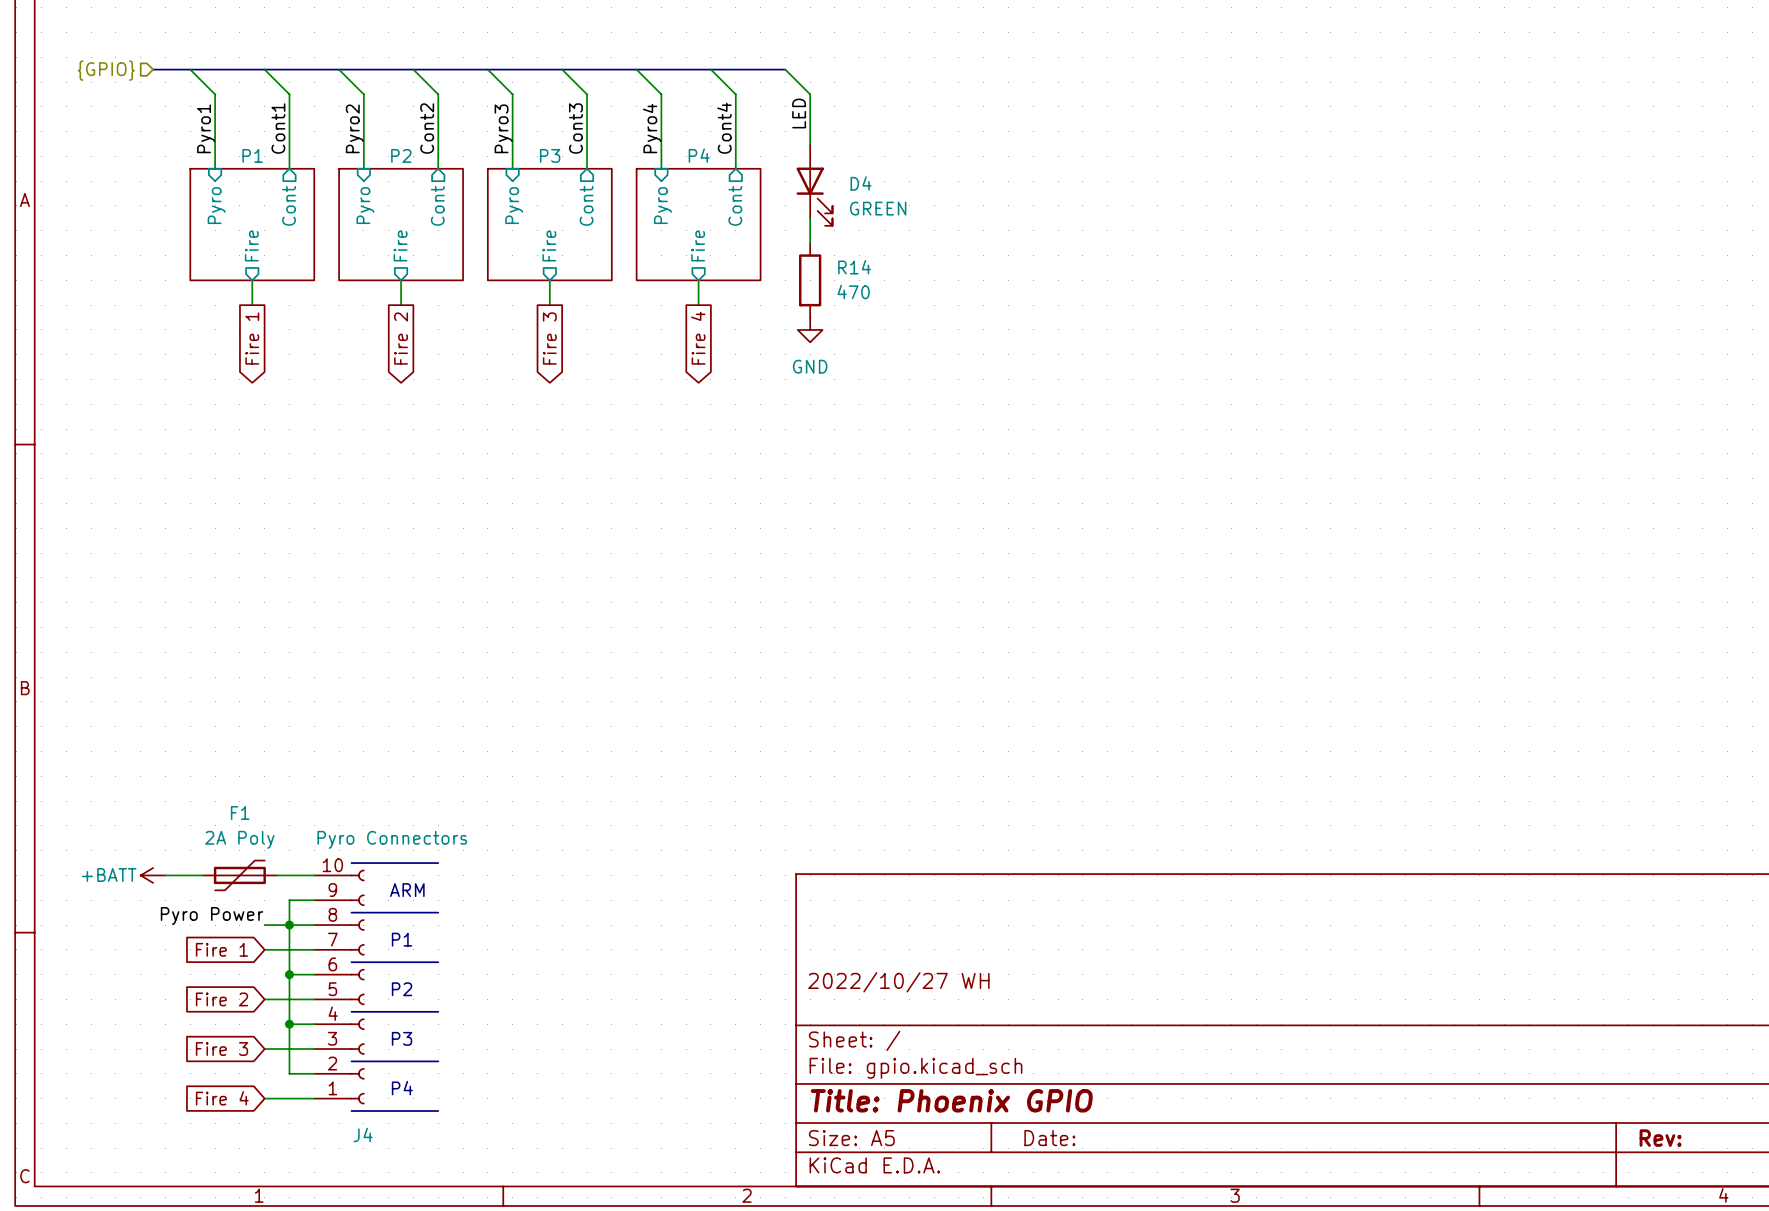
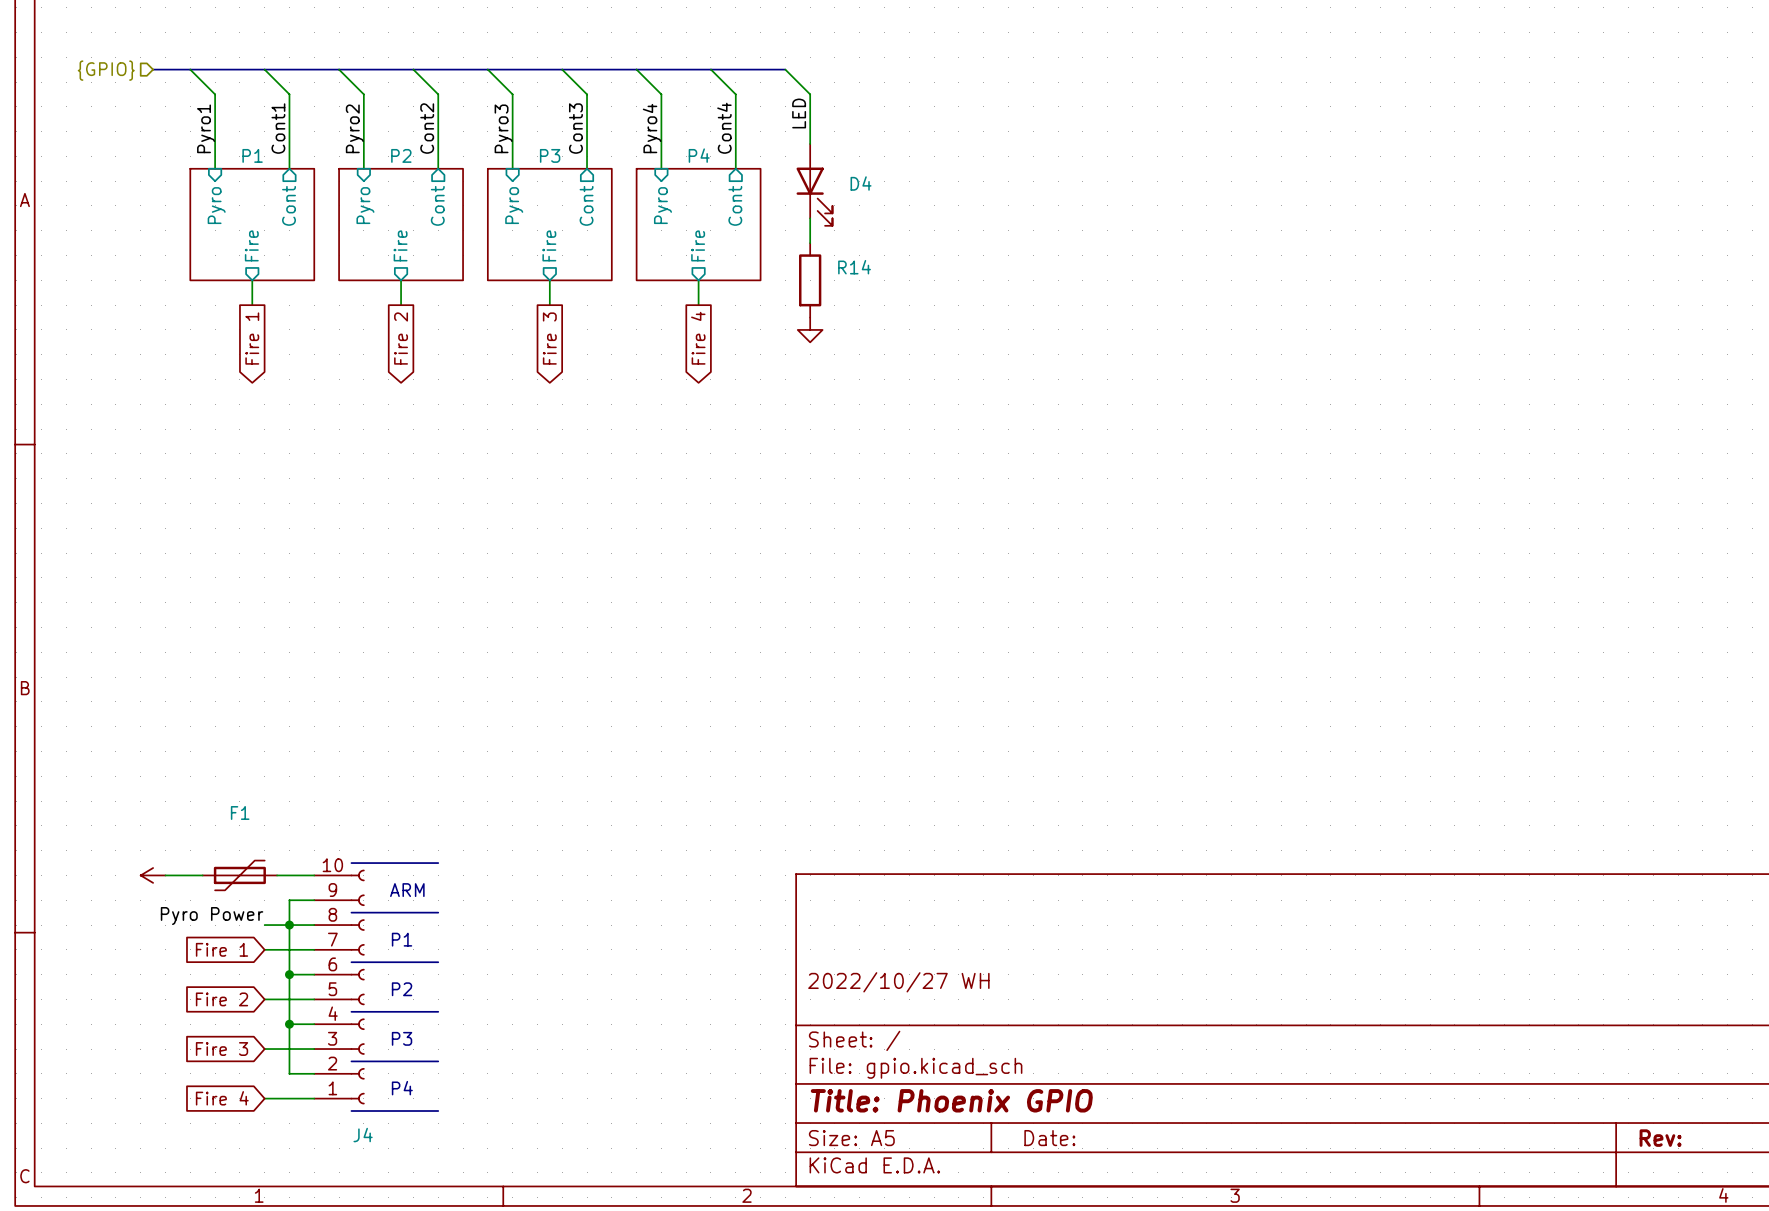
D4 value: GREEN (878, 208) -> none
R14 value: 470 (853, 292) -> none
power symbol text: GND (810, 366) -> none
F1 value: 2A Poly (239, 839) -> none
J4 value: Pyro Connectors (392, 839) -> none
power symbol text: +BATT (109, 874) -> none

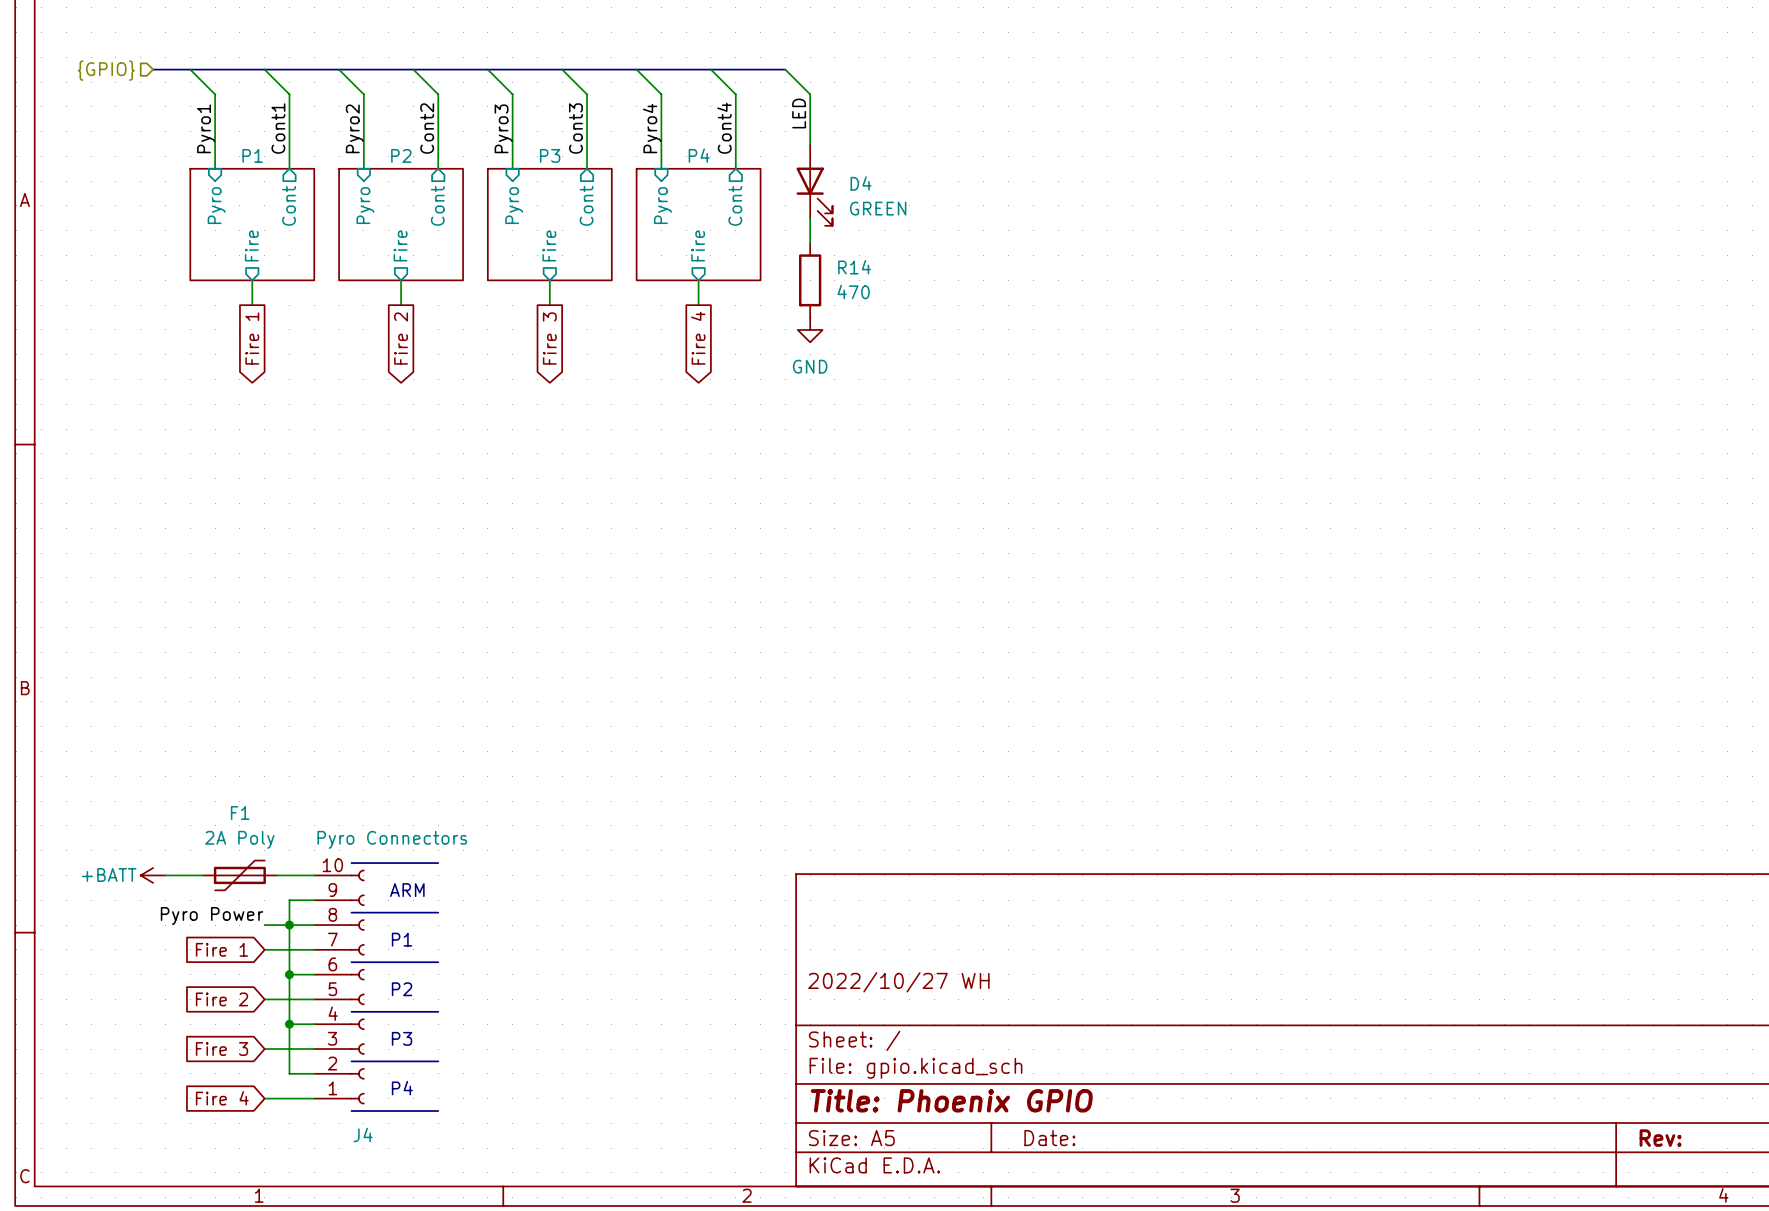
D4 value: none -> GREEN (878, 208)
R14 value: none -> 470 (853, 292)
power symbol text: none -> GND (810, 366)
F1 value: none -> 2A Poly (239, 839)
J4 value: none -> Pyro Connectors (392, 839)
power symbol text: none -> +BATT (109, 874)

